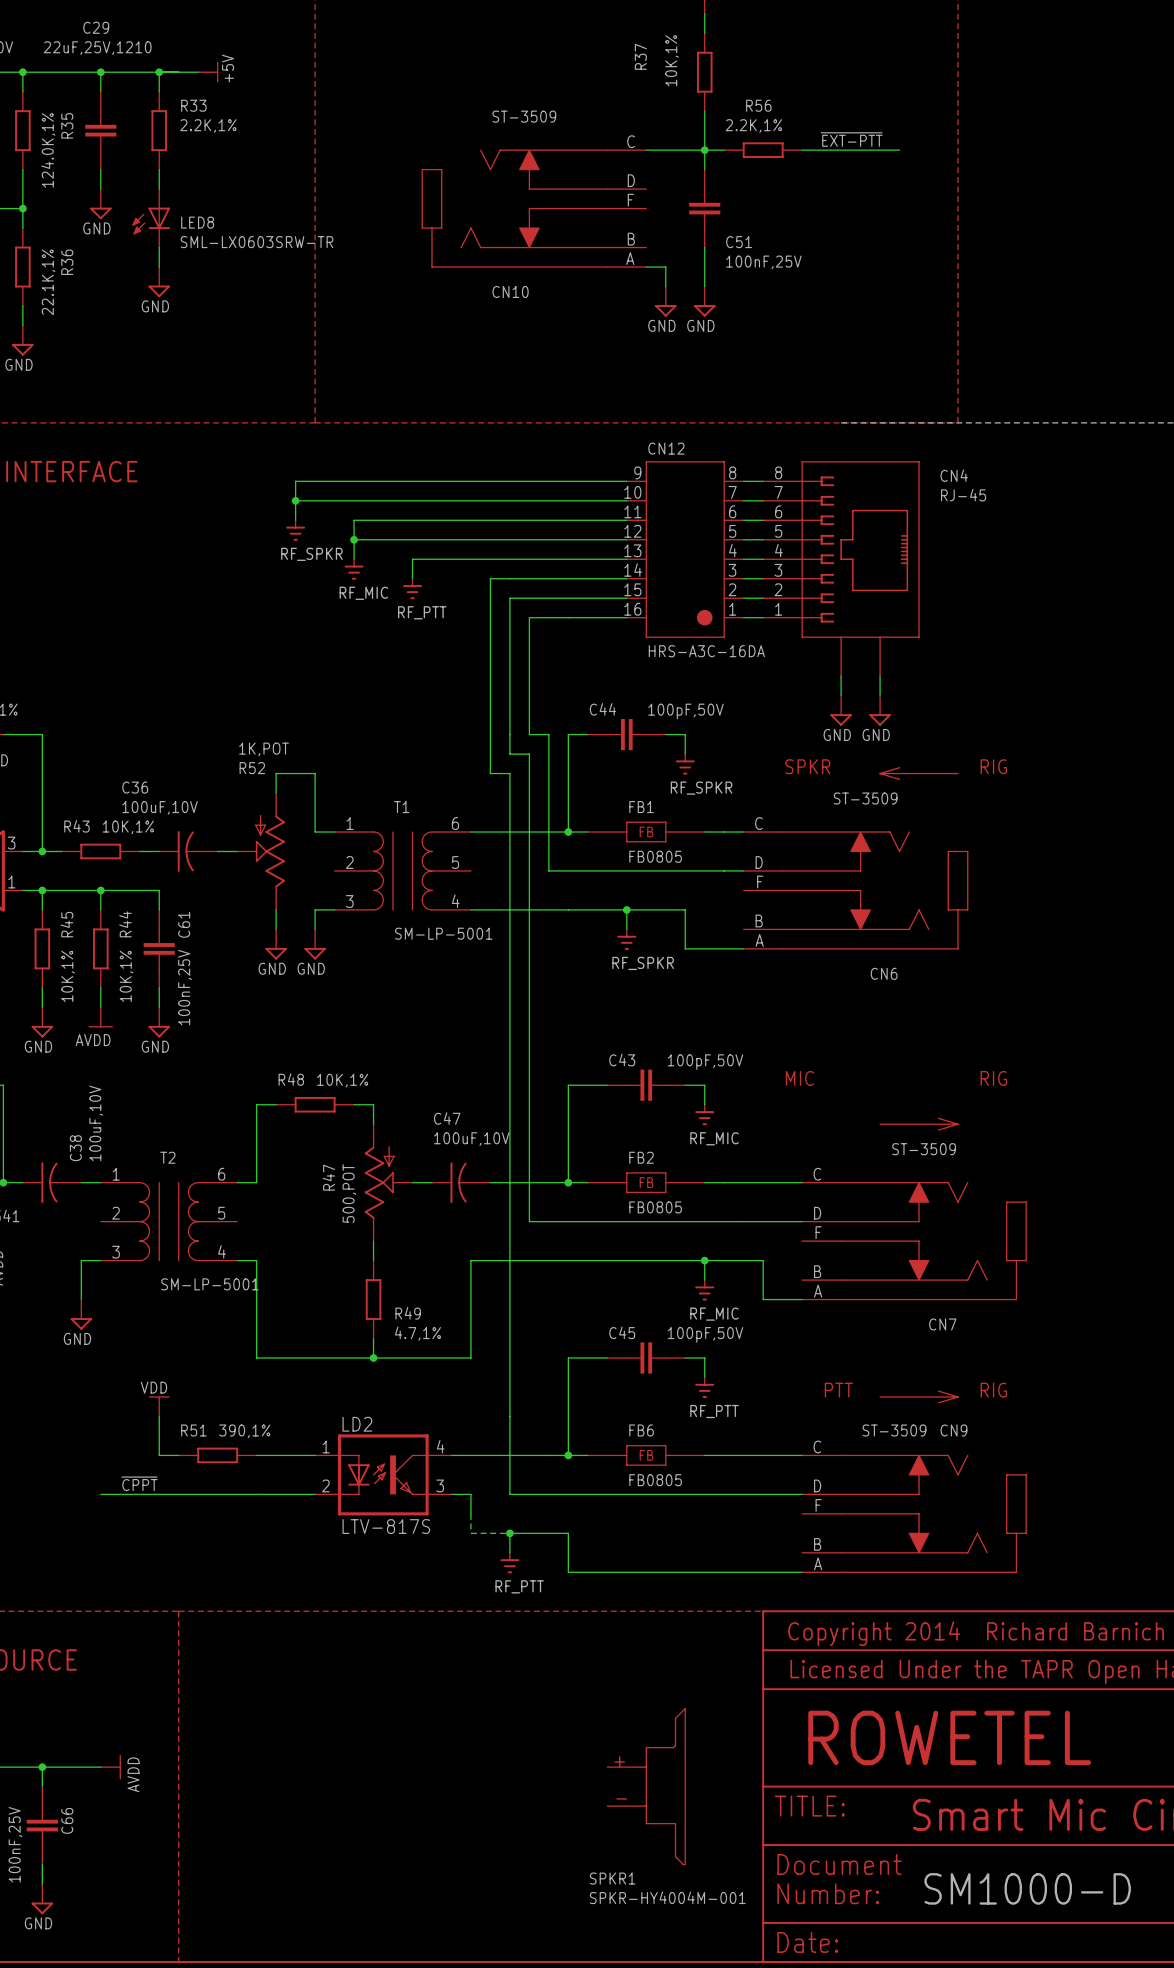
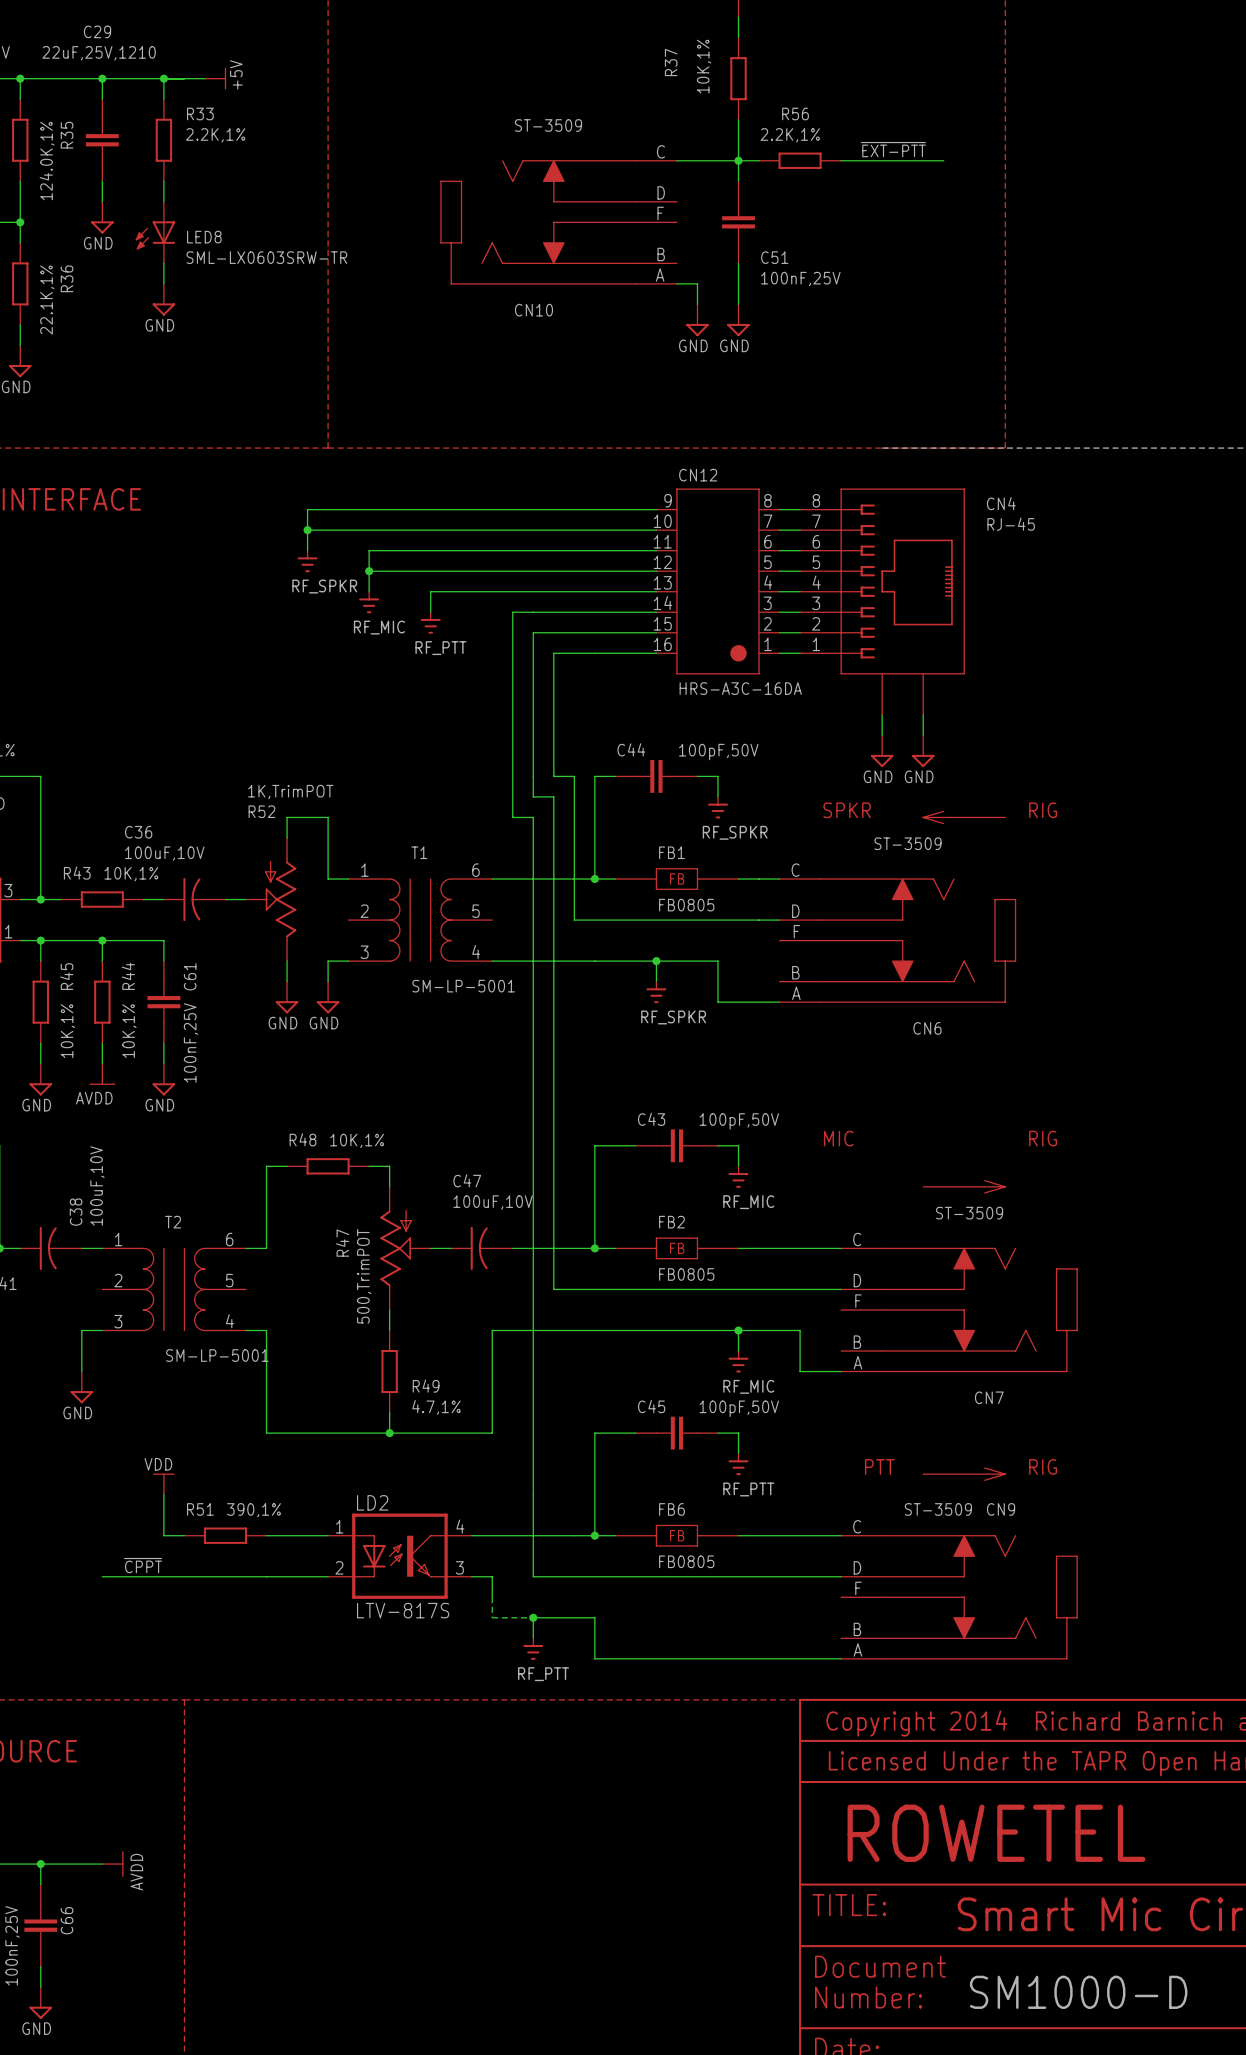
R52 value: 1K,POT (264, 749) -> 1K,TrimPOT (290, 792)
R47 value: 500,POT (349, 1193) -> 500,TrimPOT (364, 1276)
SPKR1: SPKR-HY4004M-001 (646, 1786) -> none

